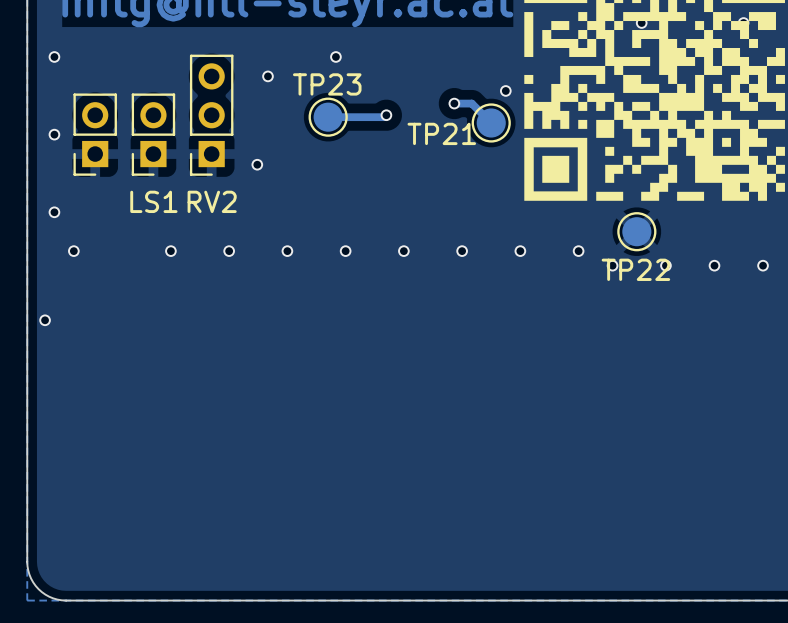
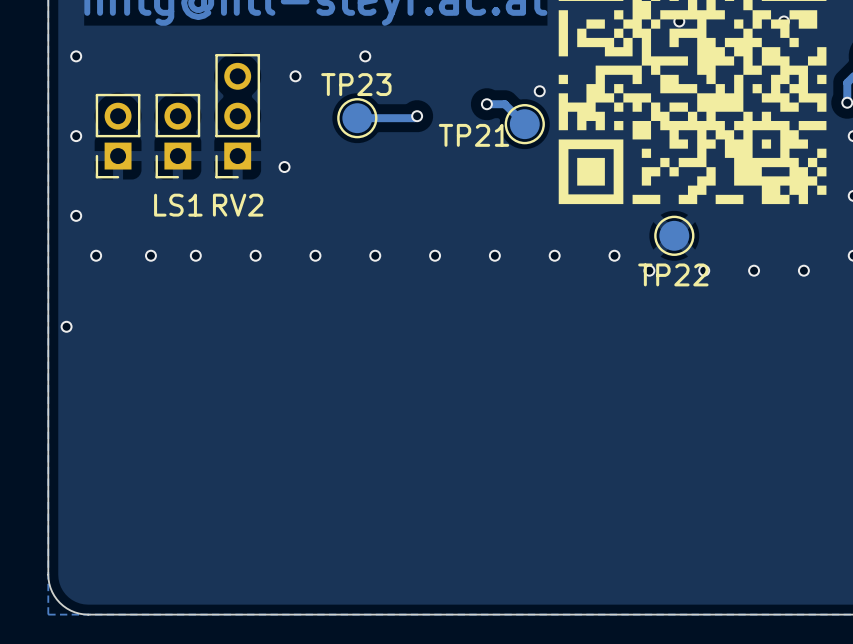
via: none -> (150, 255)

